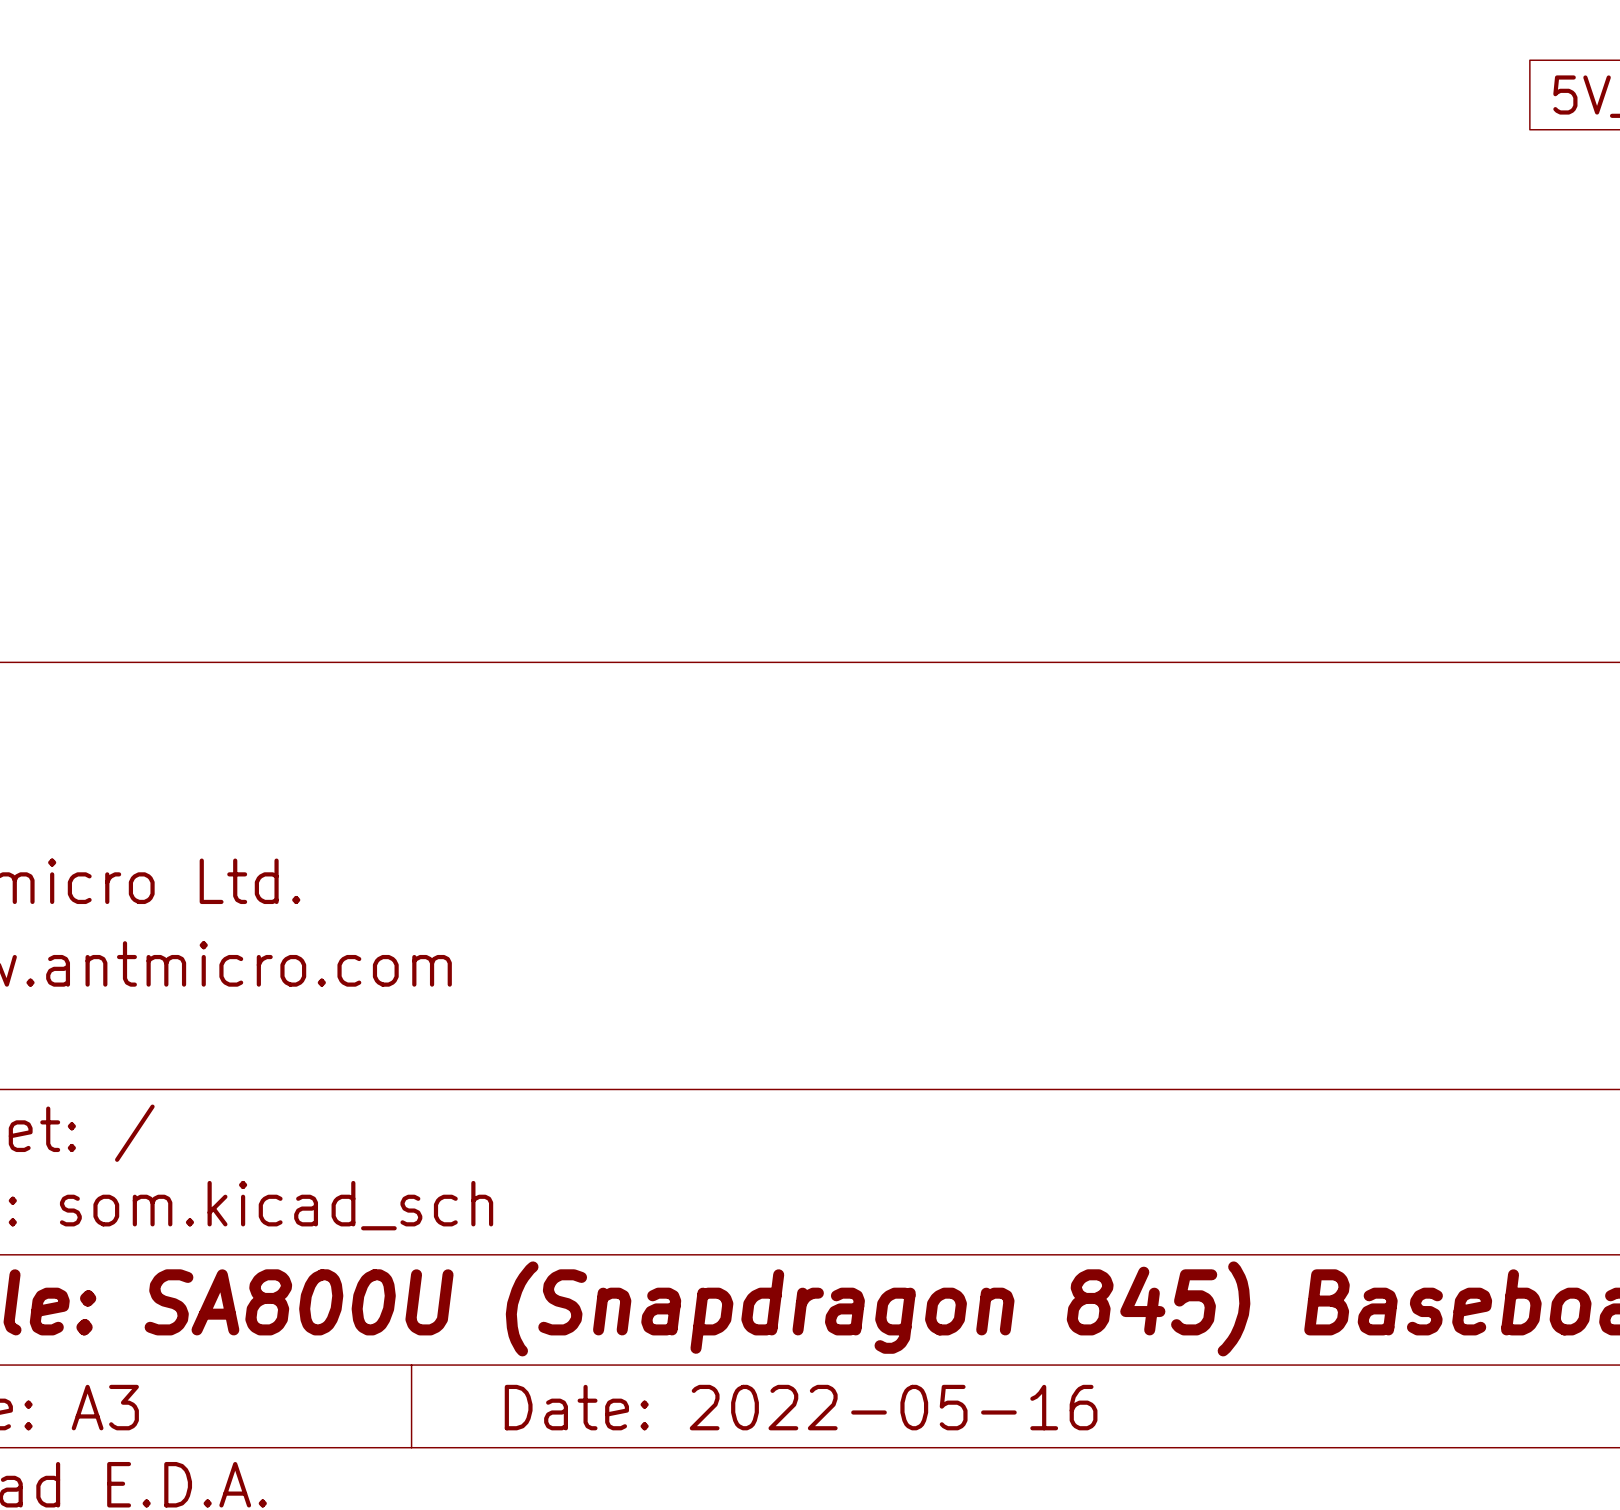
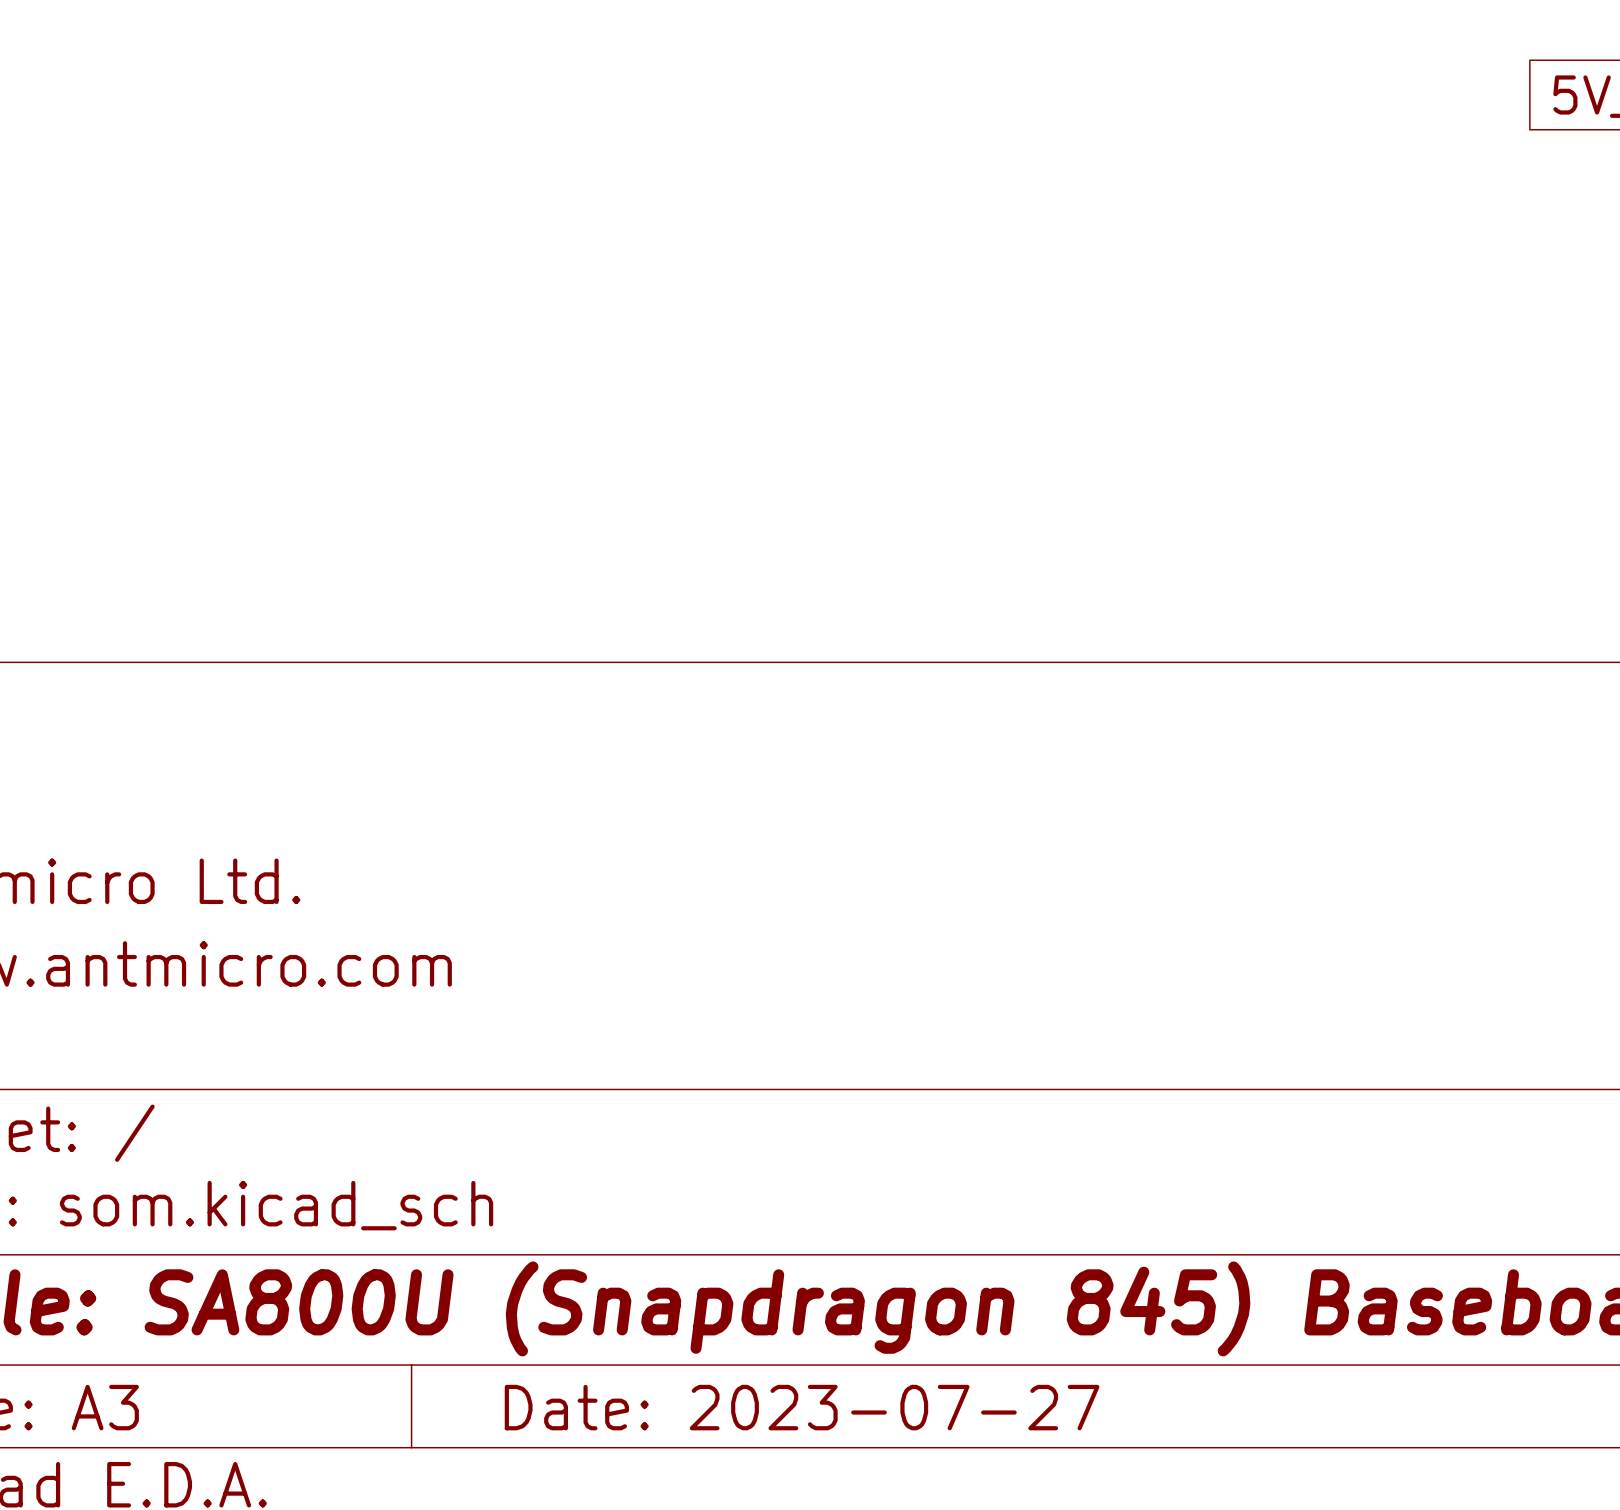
title block: Date: 2022-05-16 (801, 1407) -> Date: 2023-07-27 (802, 1407)

